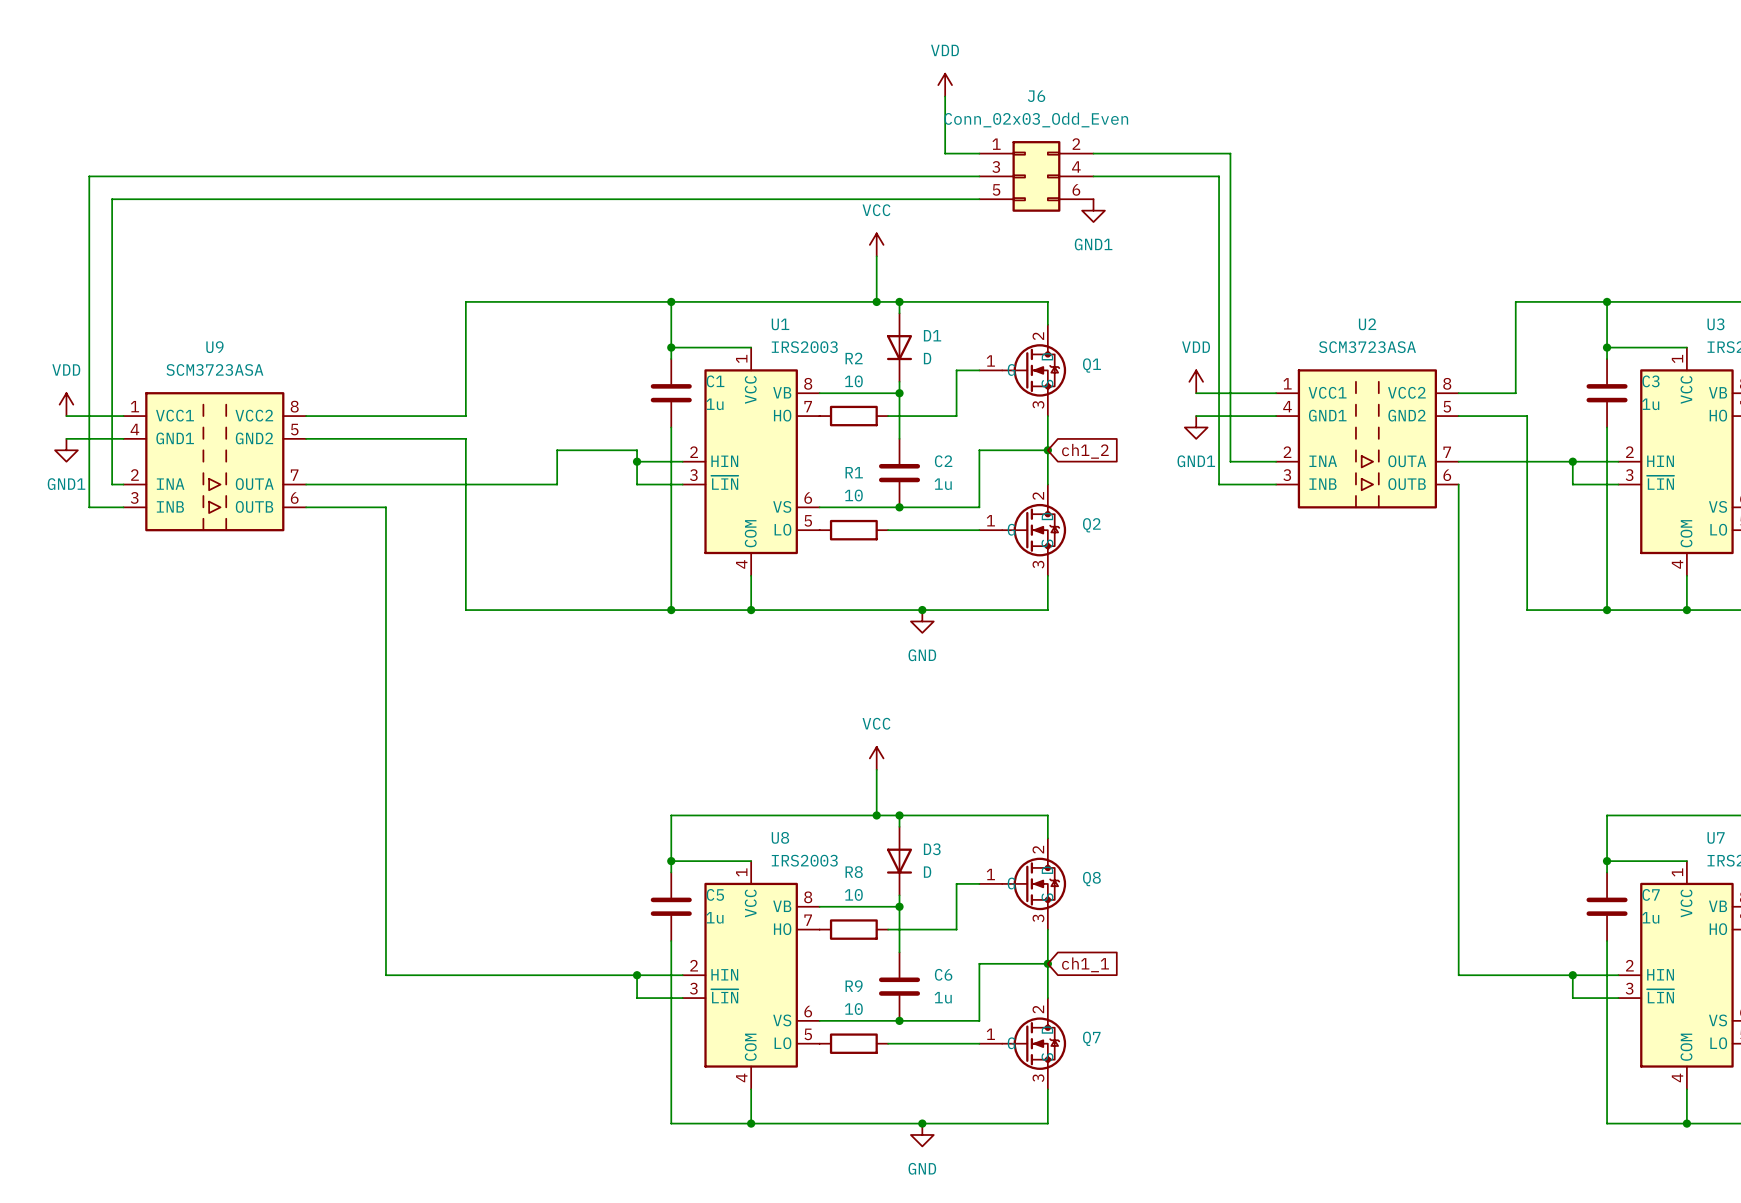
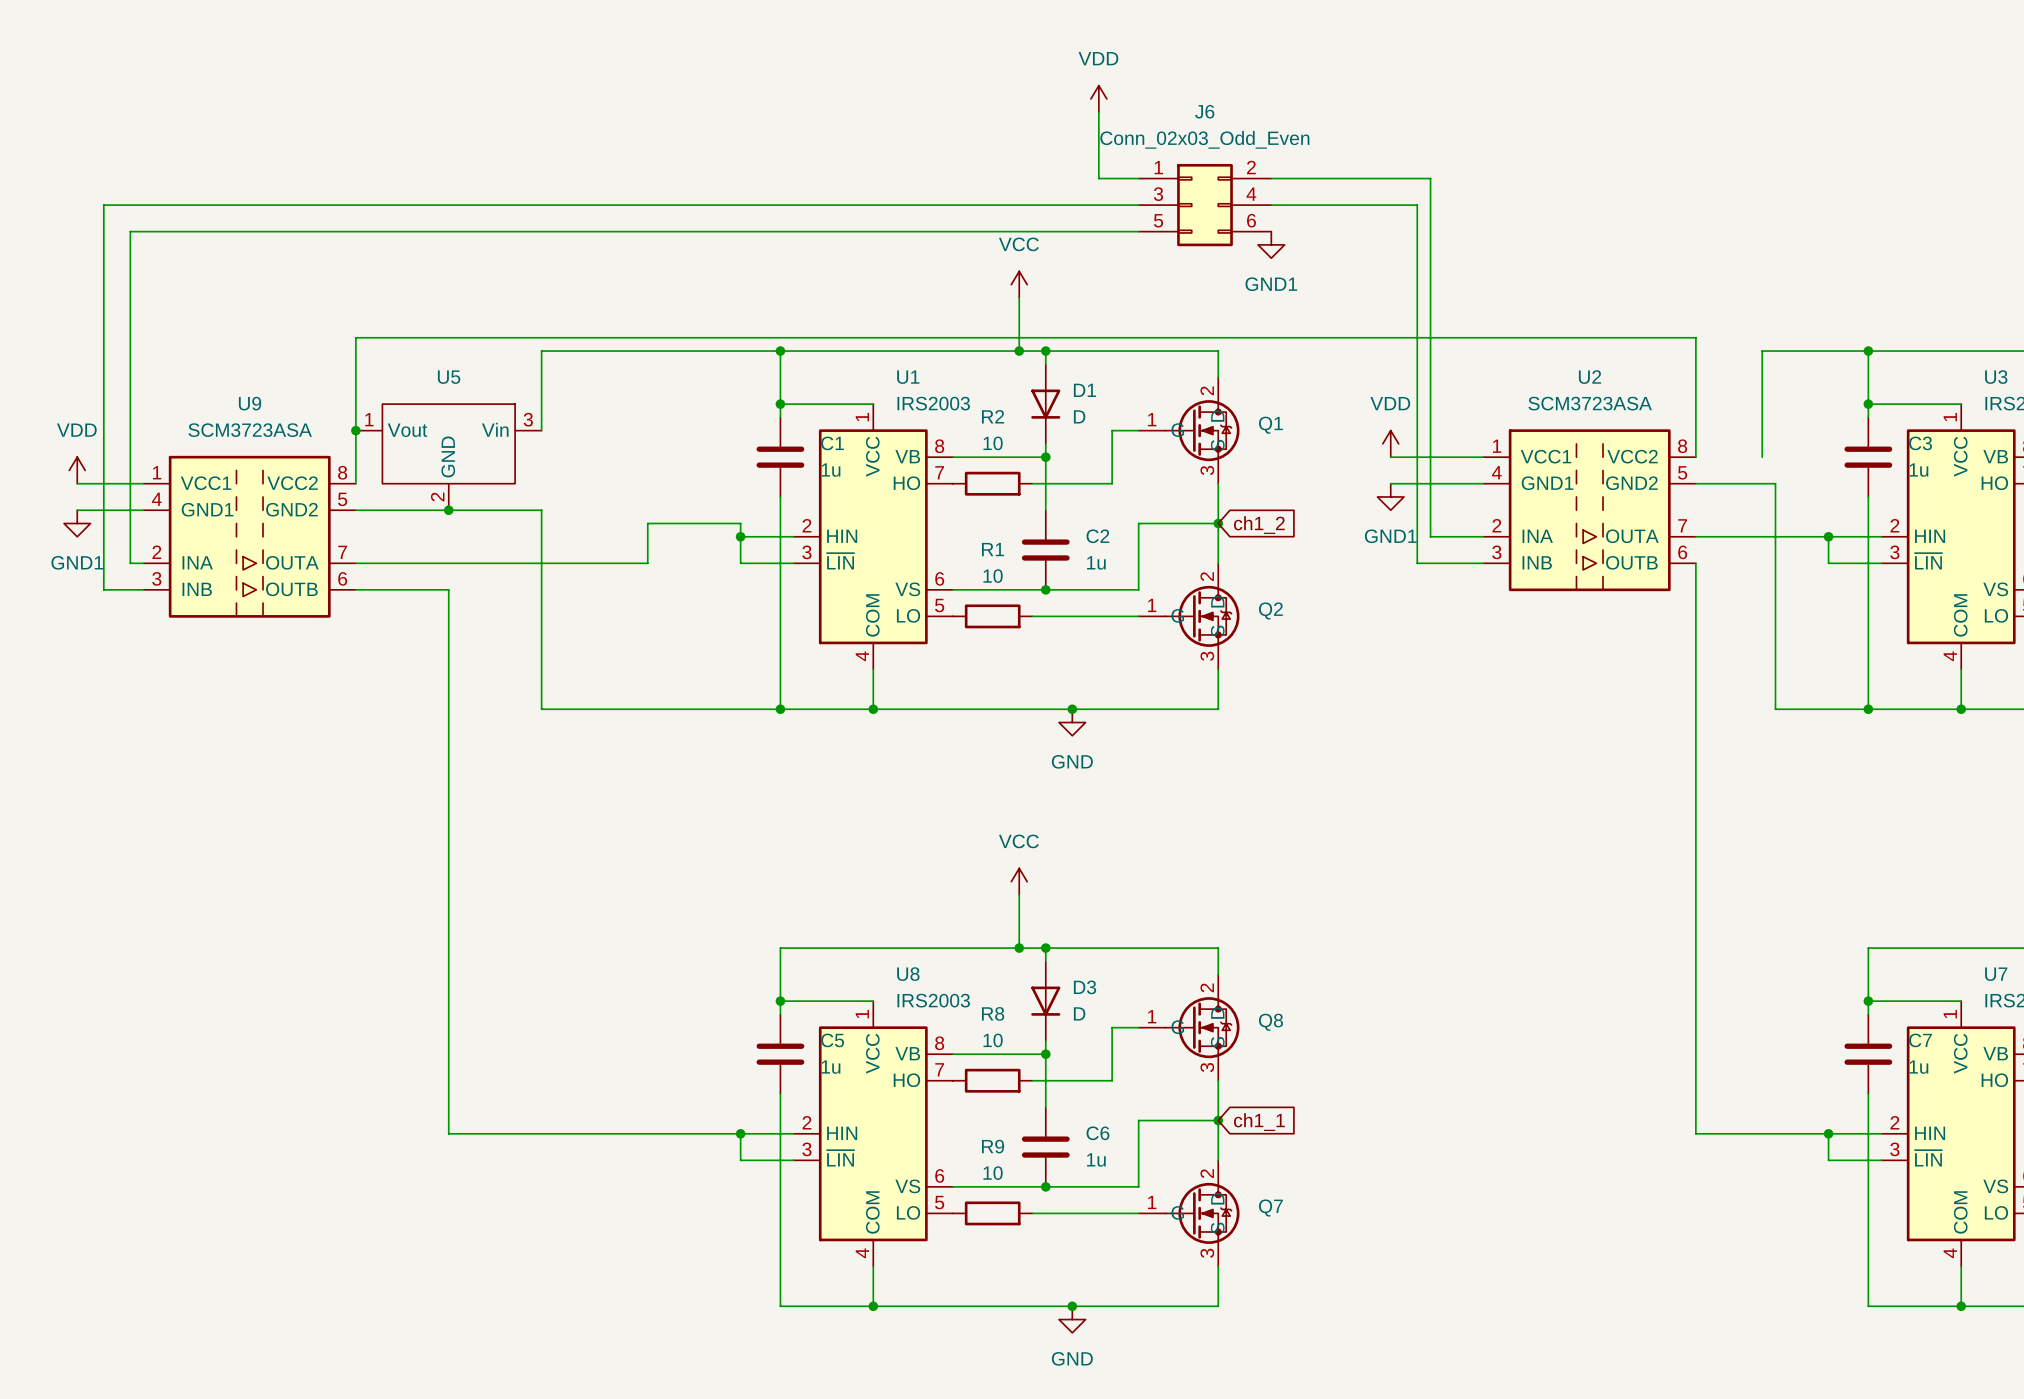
junction: none -> (355, 430)
wire: (465, 370) (465, 416) (306, 416) -> (1695, 457) (1695, 337) (355, 337) (355, 483)
U5: none -> (448, 457)
wire: (1458, 393) (1515, 393) -> none
junction: none -> (448, 510)

